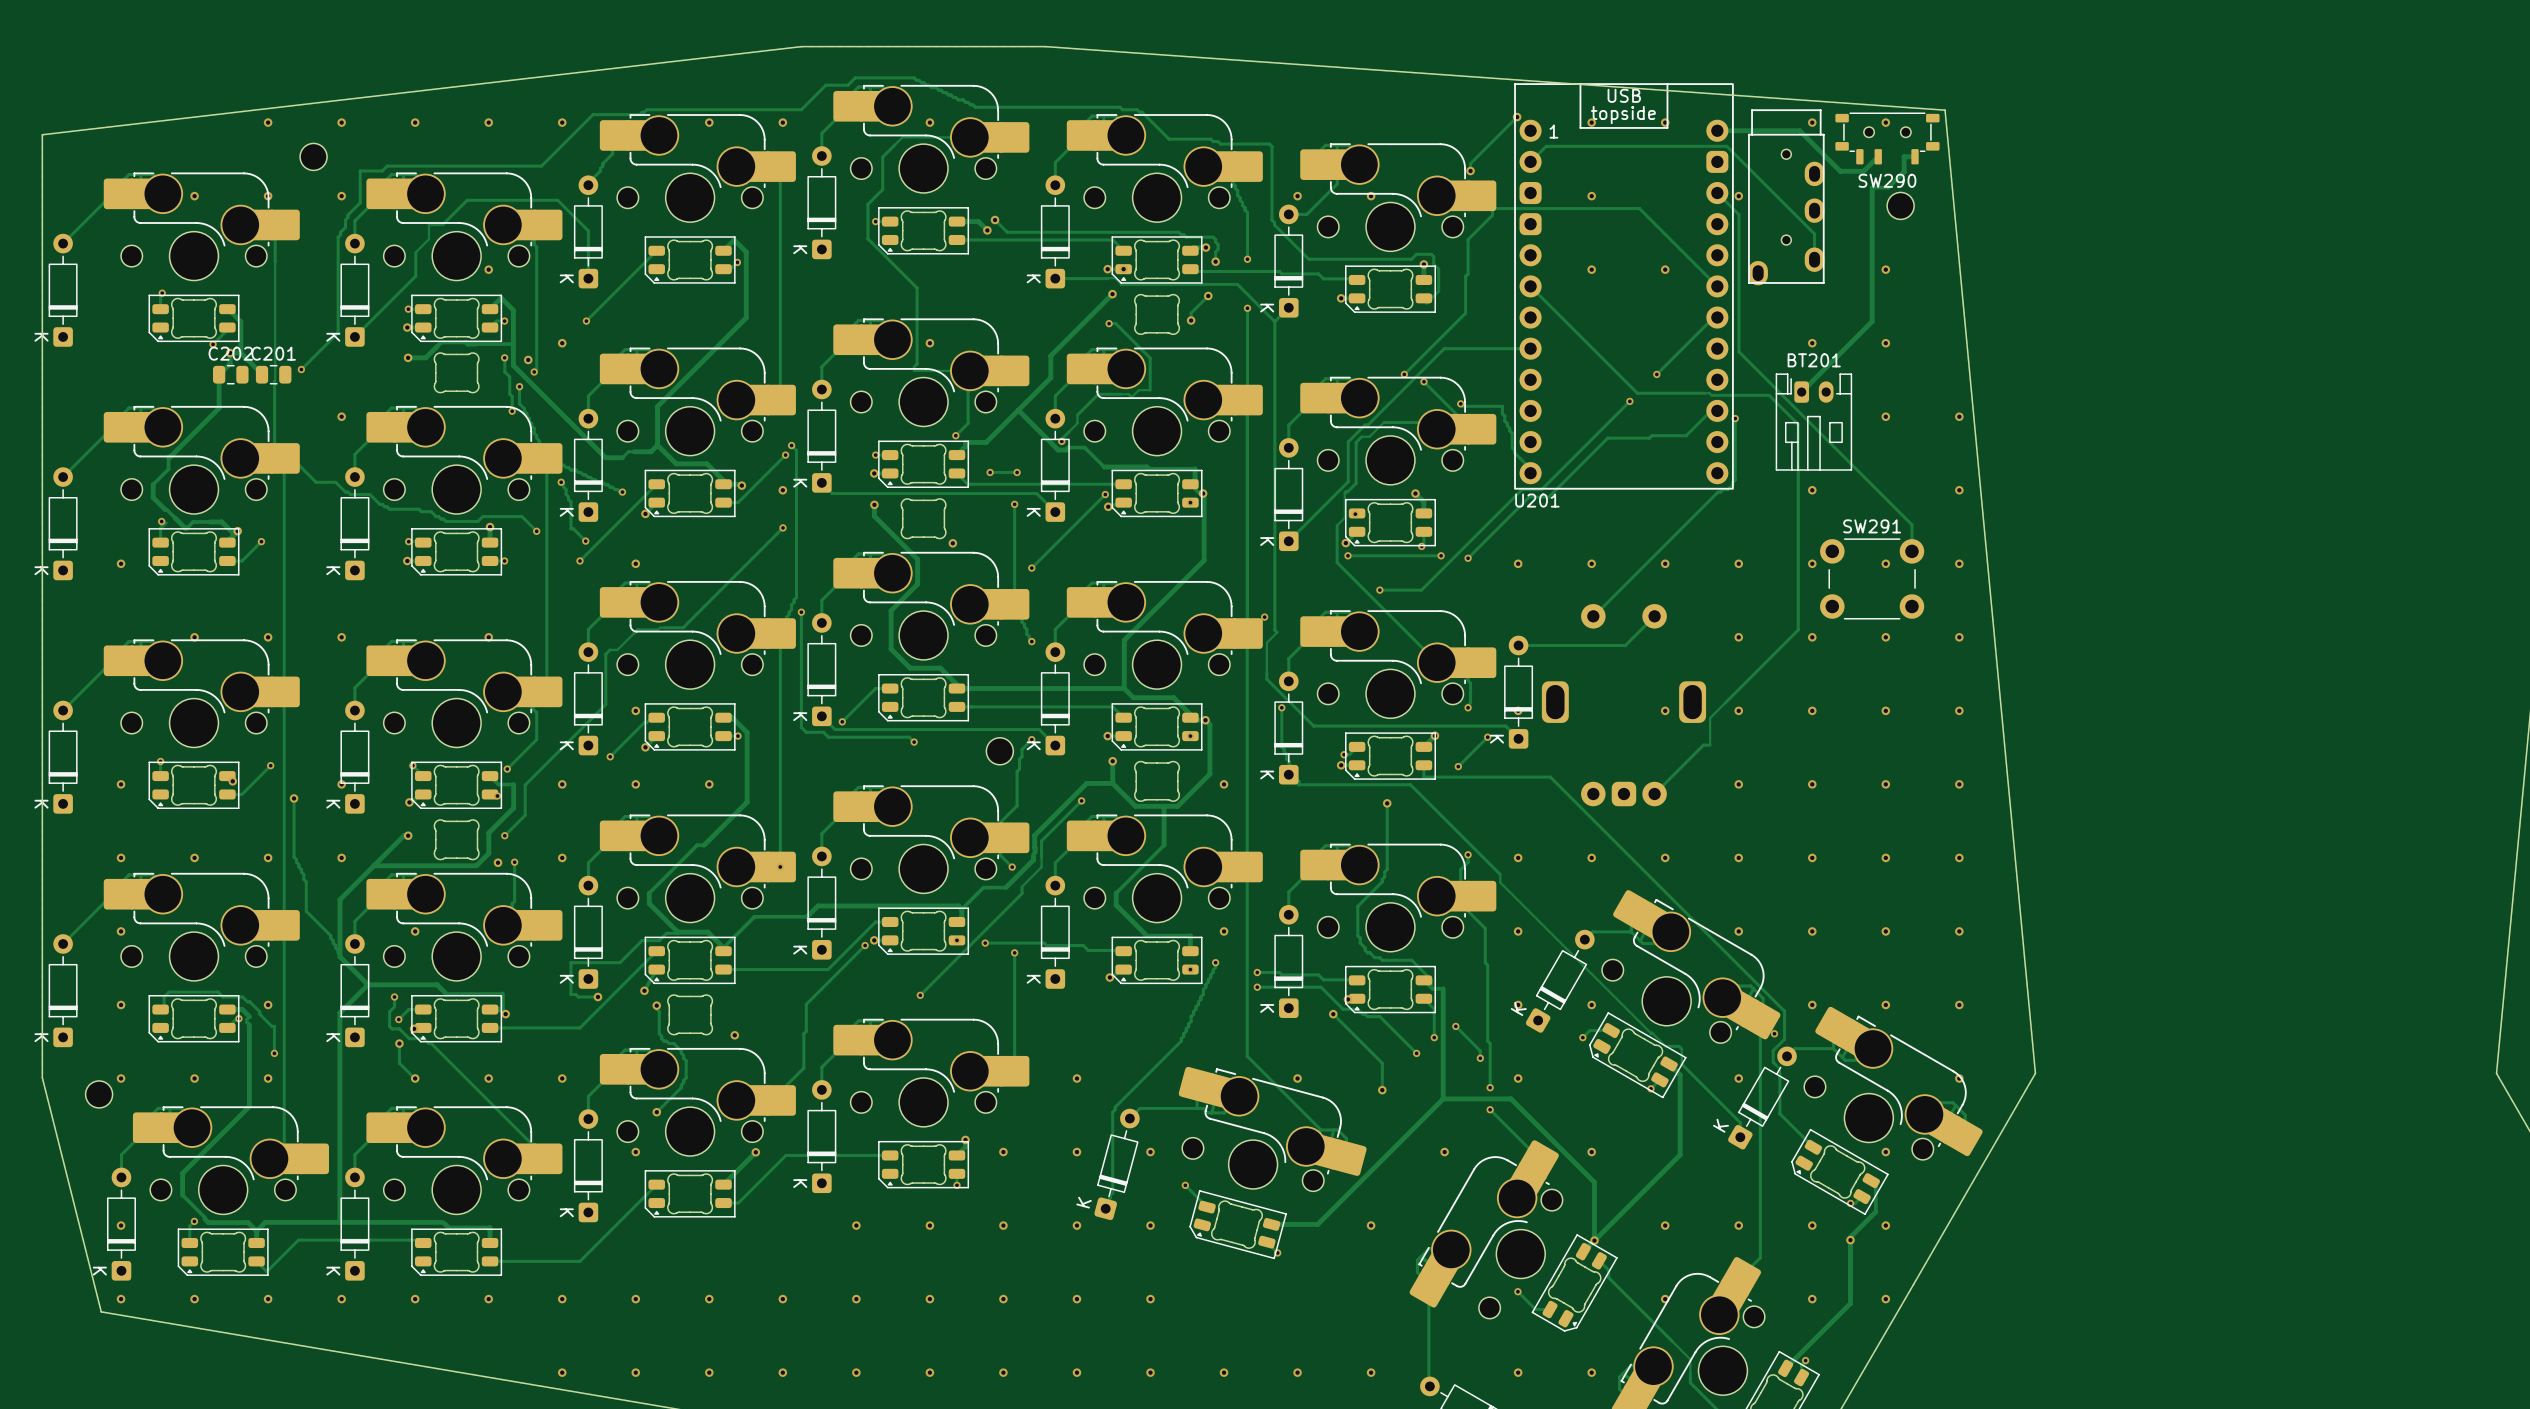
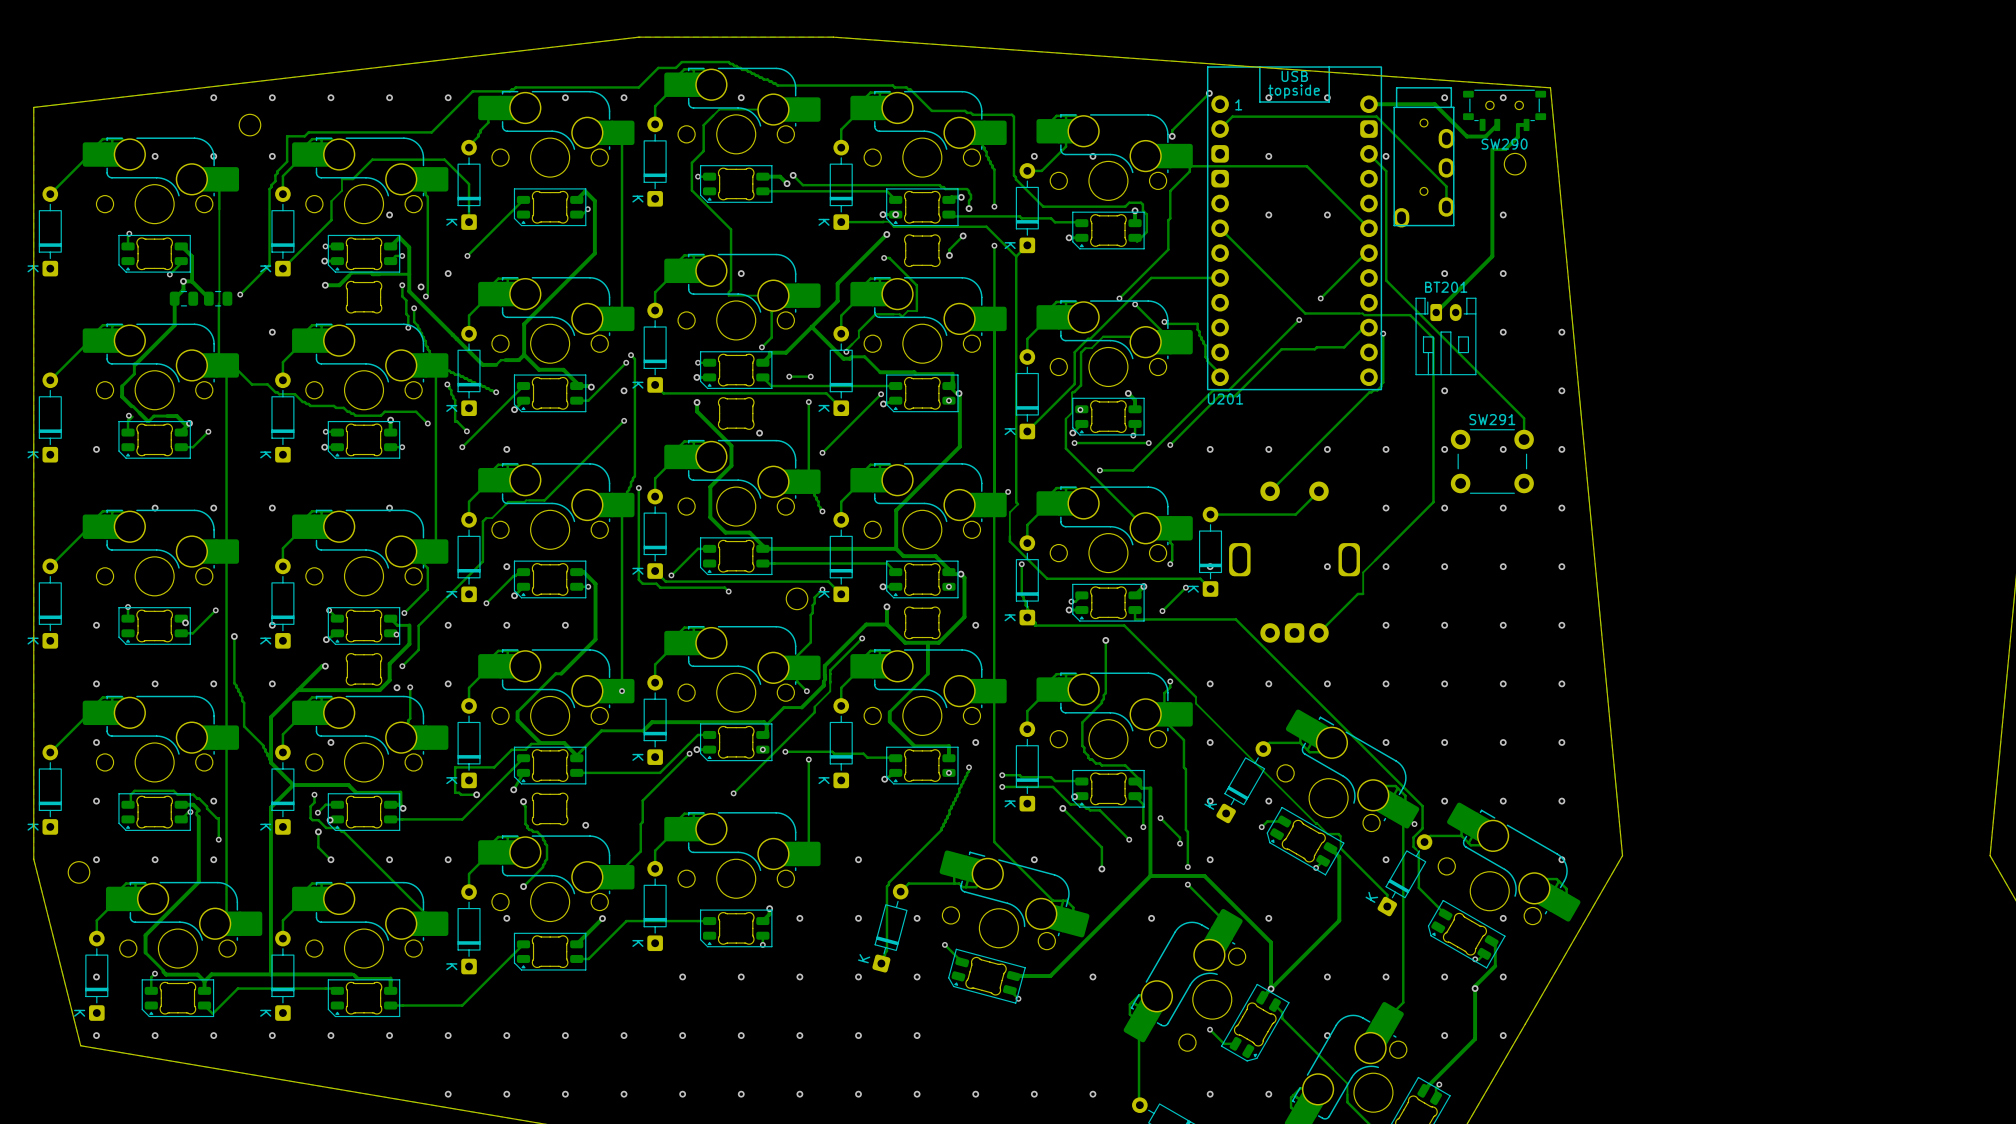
C202 name: C202 (230, 353) -> none
C201 name: C201 (273, 353) -> none

